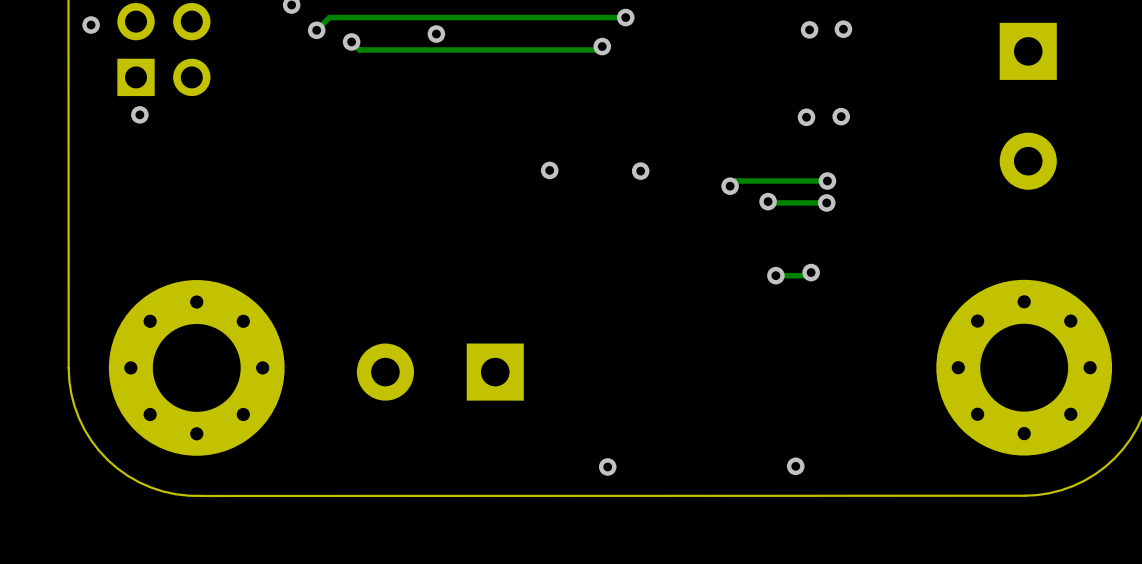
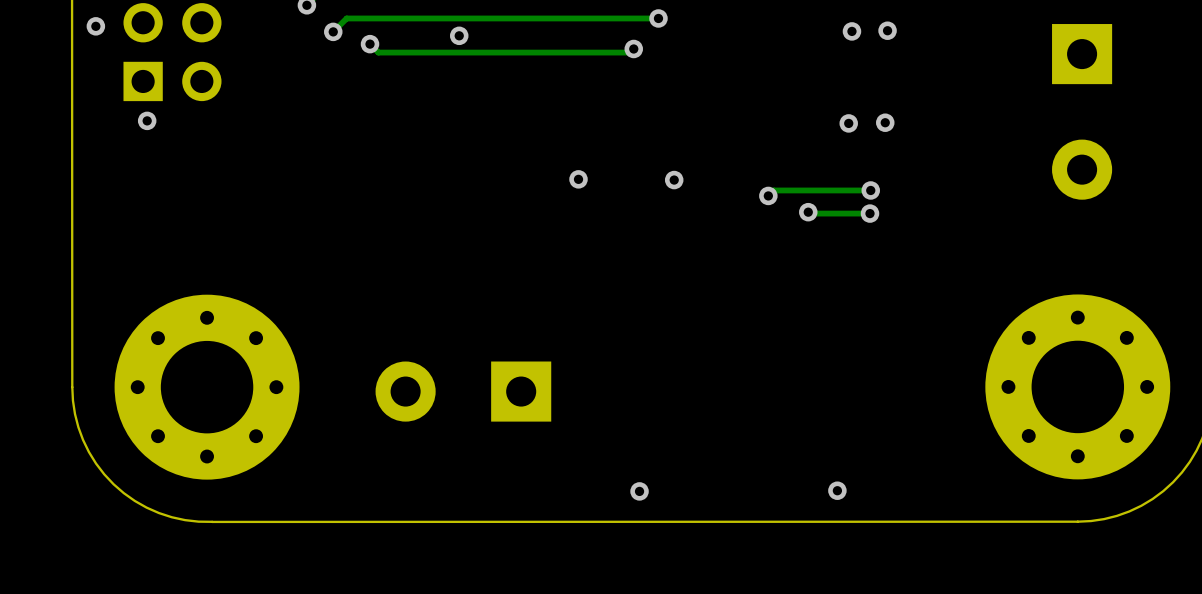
track: (811, 272) (808, 275) (775, 275) -> none
via: (811, 272) -> none
via: (775, 275) -> none

